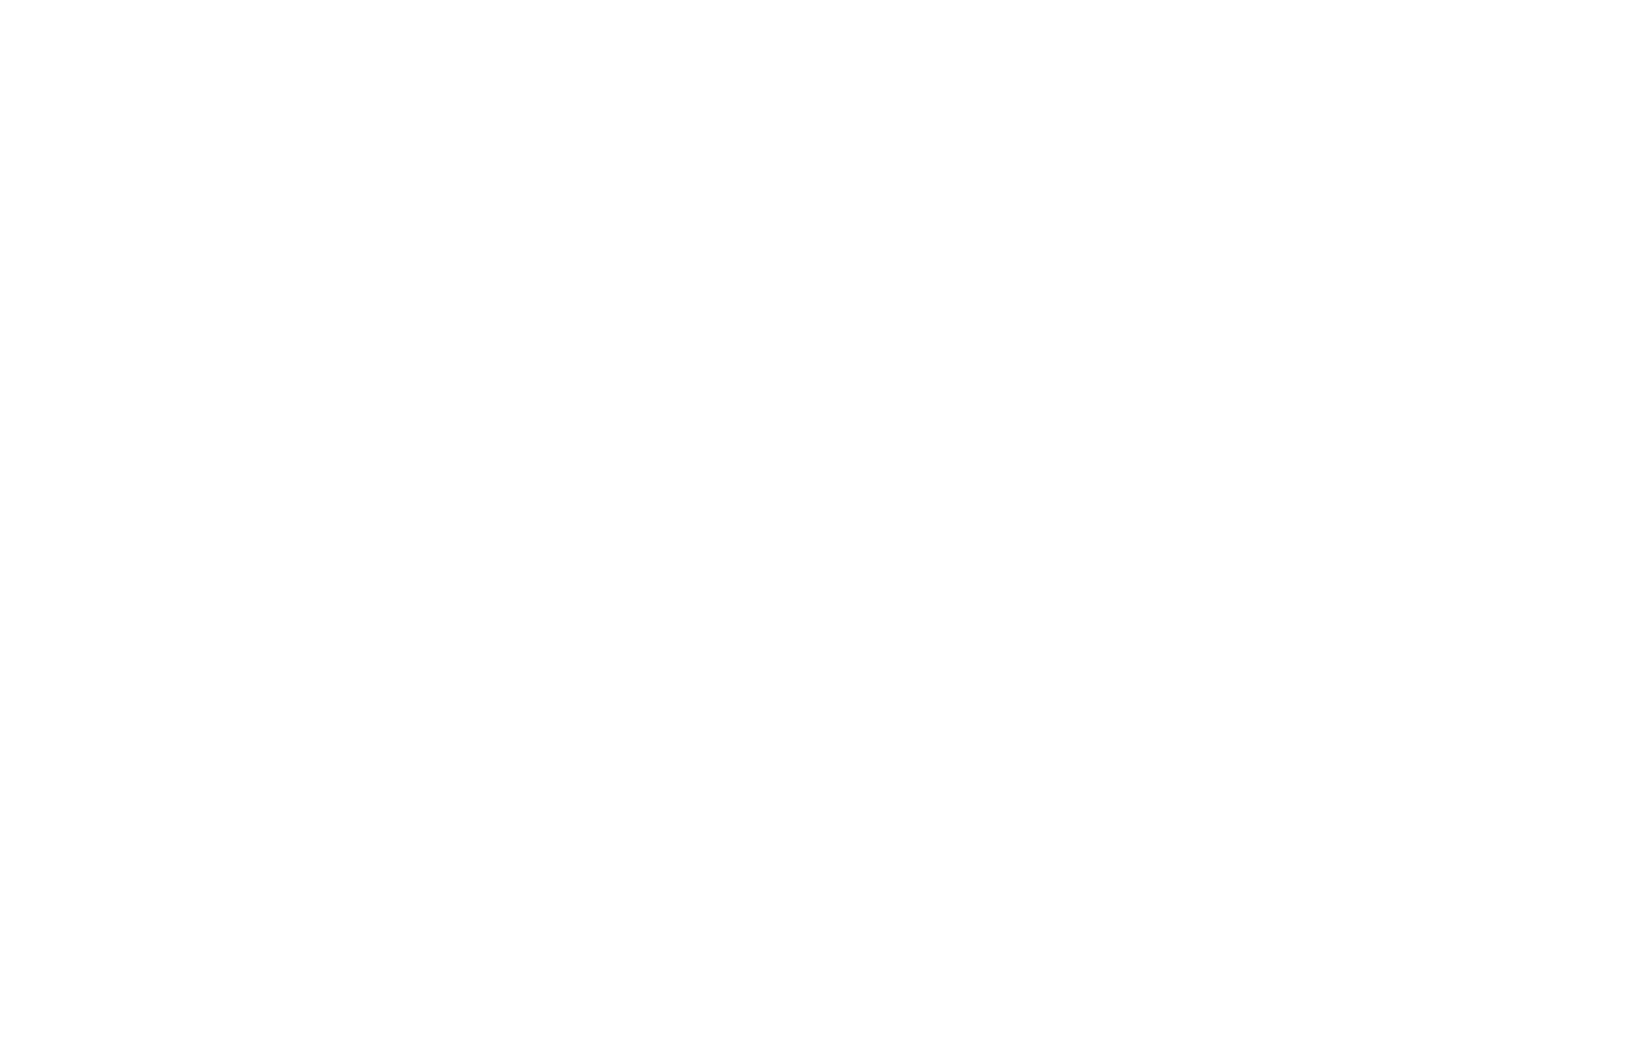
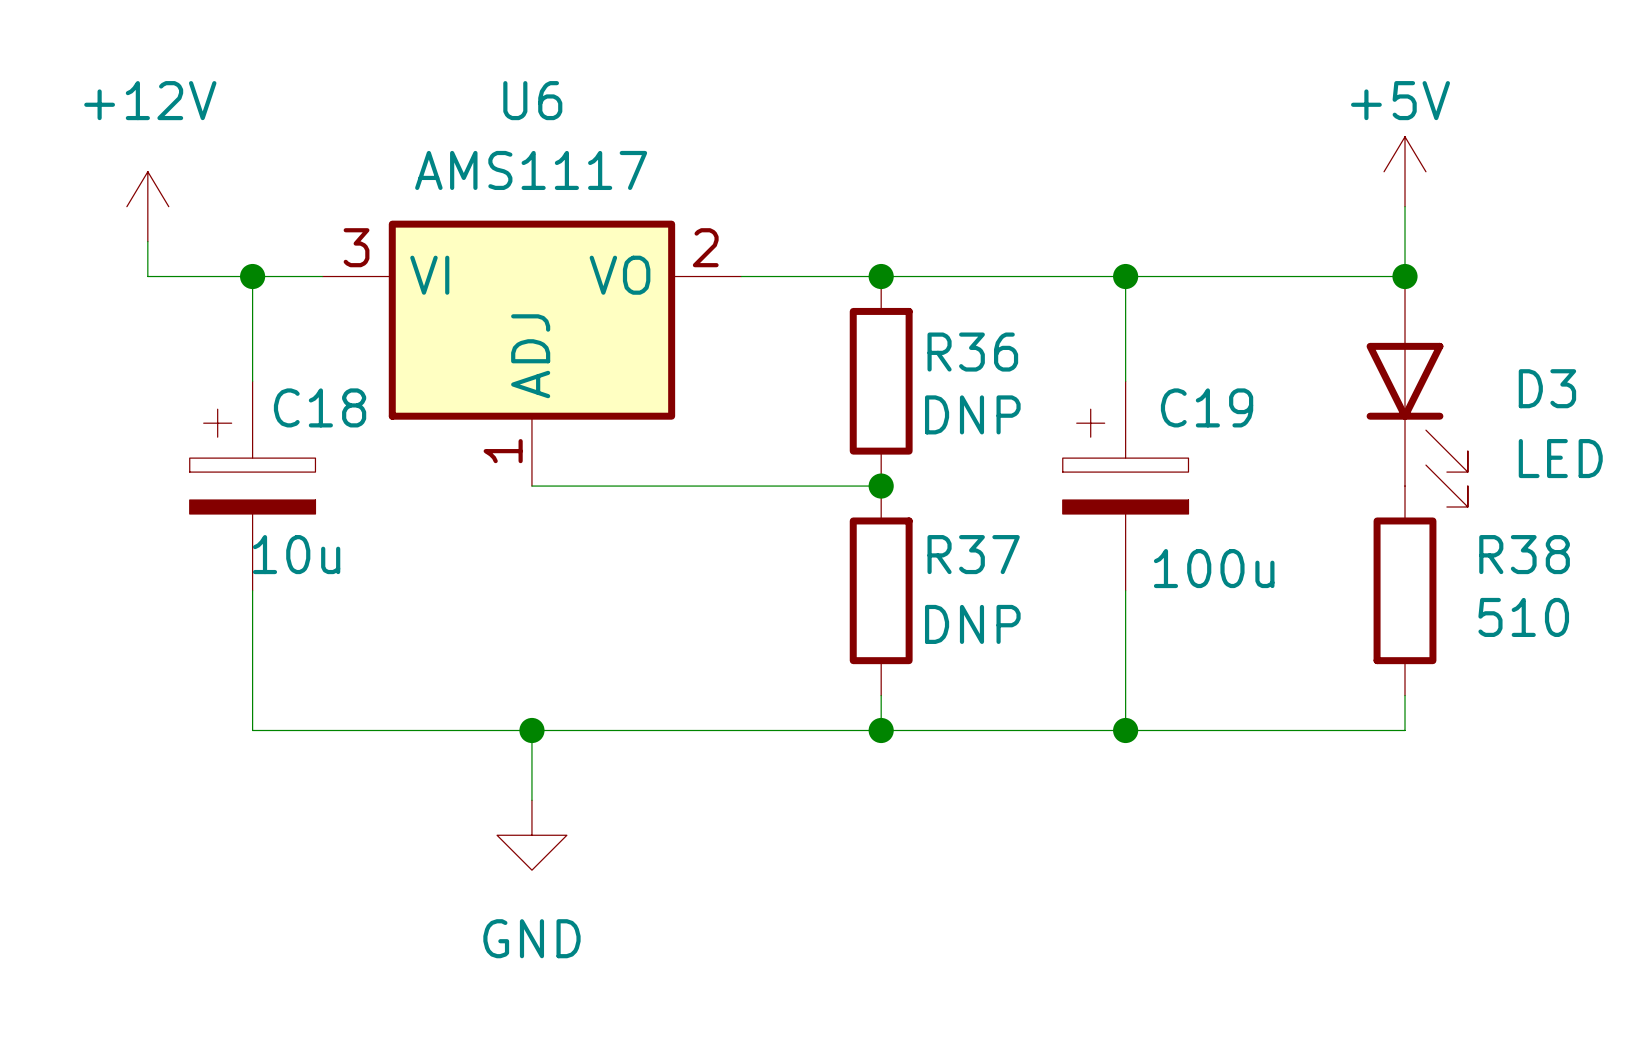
power symbol: none -> +5V (1405, 171)
power symbol: none -> +12V (147, 206)
wire: none -> (1405, 206) (1405, 276) (741, 276)
wire: none -> (147, 241) (147, 276) (322, 276)
wire: none -> (252, 276) (252, 381)
junction: none -> (252, 276)
junction: none -> (881, 276)
wire: none -> (1125, 276) (1125, 381)
junction: none -> (1125, 276)
junction: none -> (1405, 276)
U6: none -> AMS1117 (531, 353)
R36: none -> DNP (881, 381)
D3: none -> LED (1417, 391)
C18: none -> 10u (252, 486)
wire: none -> (531, 486) (881, 486)
junction: none -> (881, 486)
C19: none -> 100u (1125, 486)
wire: none -> (252, 590) (252, 730) (1405, 730) (1405, 695)
R37: none -> DNP (881, 590)
wire: none -> (1125, 590) (1125, 730)
R38: none -> 510 (1405, 590)
wire: none -> (881, 695) (881, 730)
wire: none -> (531, 730) (531, 800)
junction: none -> (531, 730)
junction: none -> (881, 730)
junction: none -> (1125, 730)
power symbol: none -> GND (531, 835)

